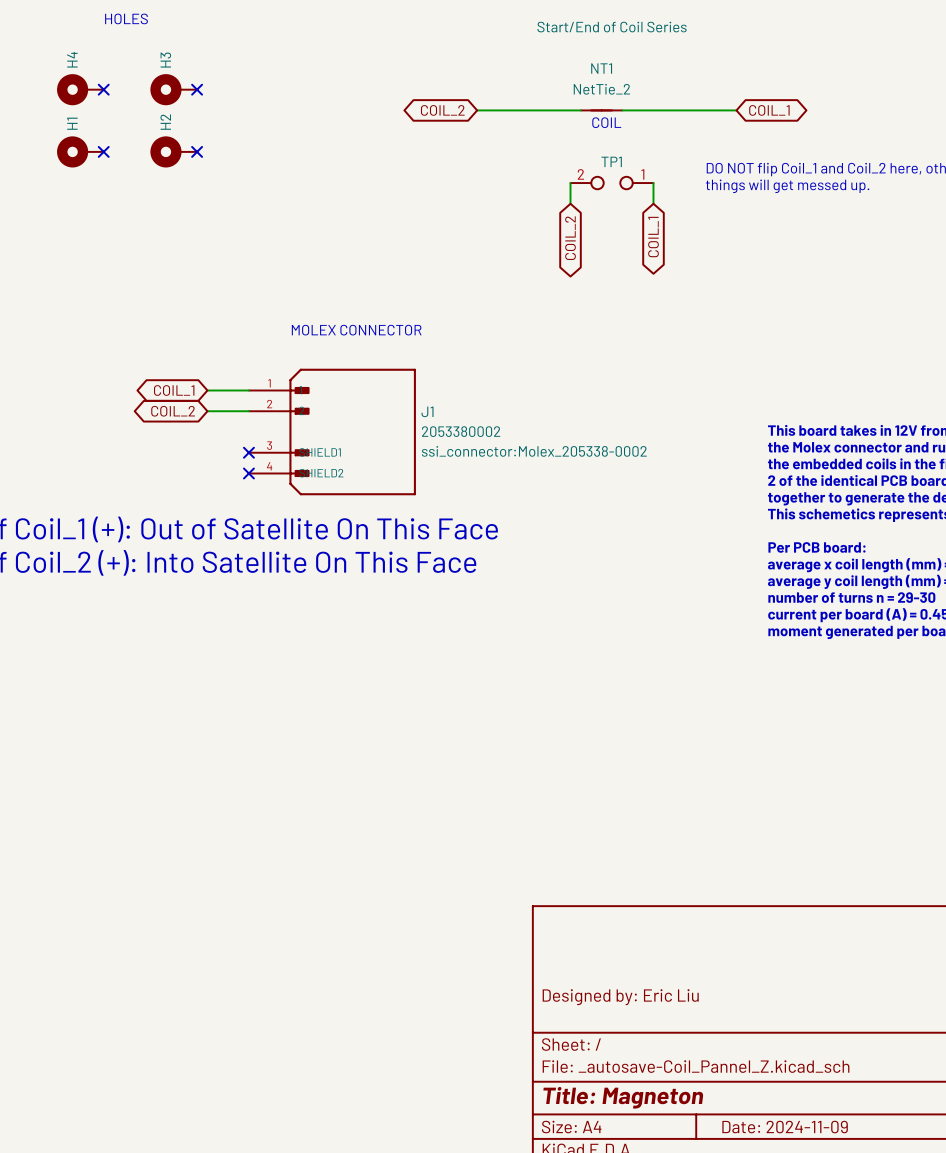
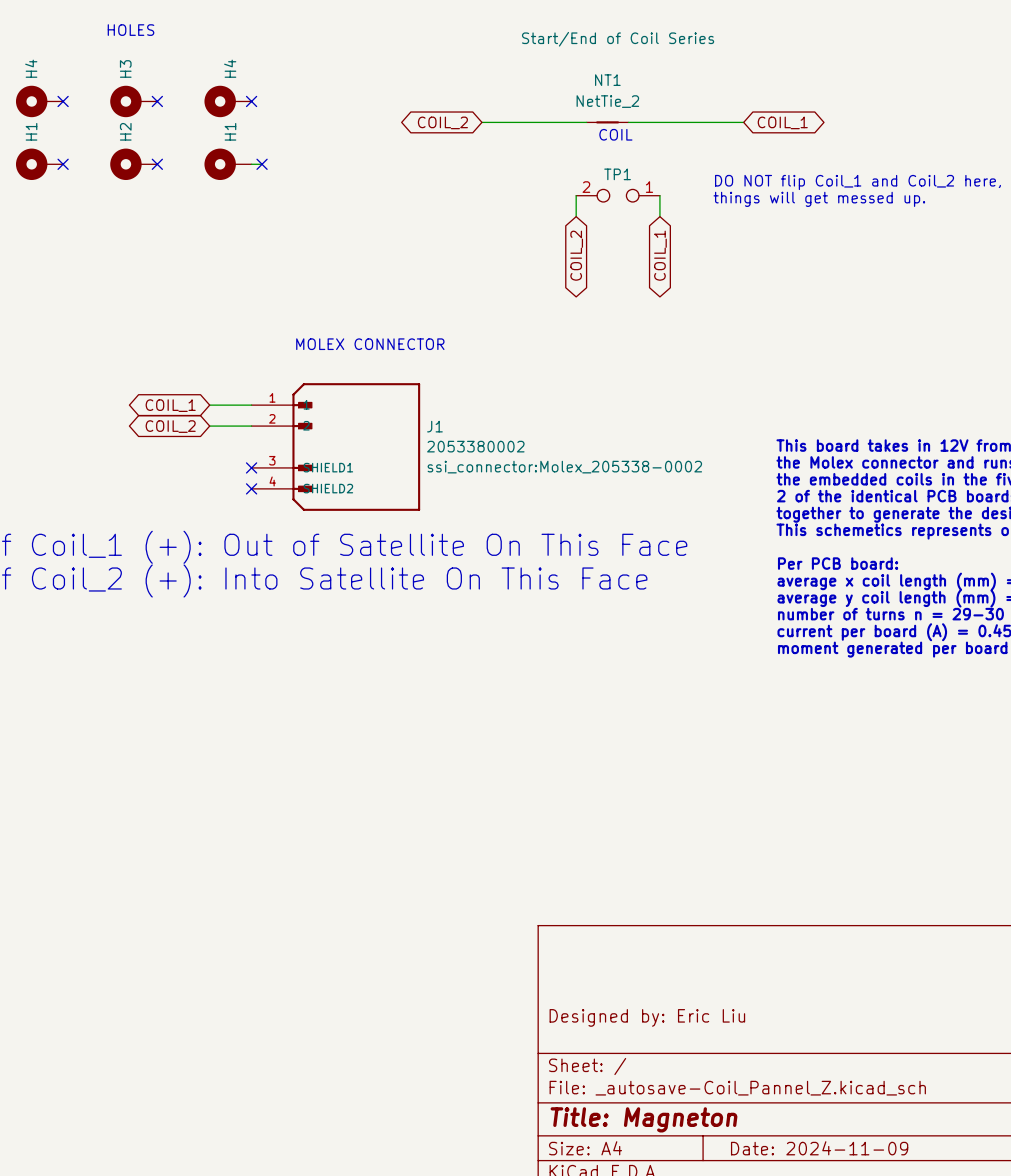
no-connect mark: none -> (63, 101)
H4 position: (80, 89) -> (39, 101)
no-connect mark: (103, 89) -> none
no-connect mark: none -> (157, 101)
H3 position: (173, 89) -> (133, 101)
no-connect mark: (197, 89) -> none
H4: none -> (228, 101)
no-connect mark: none -> (251, 101)
no-connect mark: none -> (63, 164)
H1 position: (80, 151) -> (39, 164)
no-connect mark: (103, 151) -> none
no-connect mark: none -> (157, 164)
H2 position: (173, 151) -> (133, 164)
no-connect mark: (197, 151) -> none
H1: none -> (228, 164)
wire: none -> (251, 164) (262, 164)
no-connect mark: none -> (262, 164)

